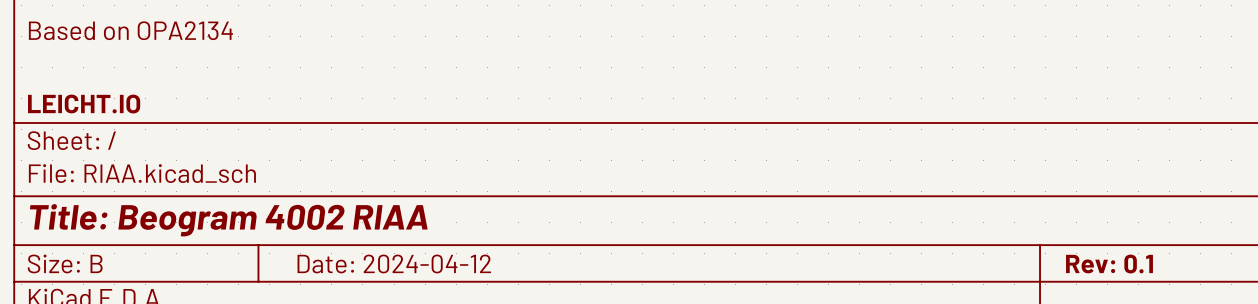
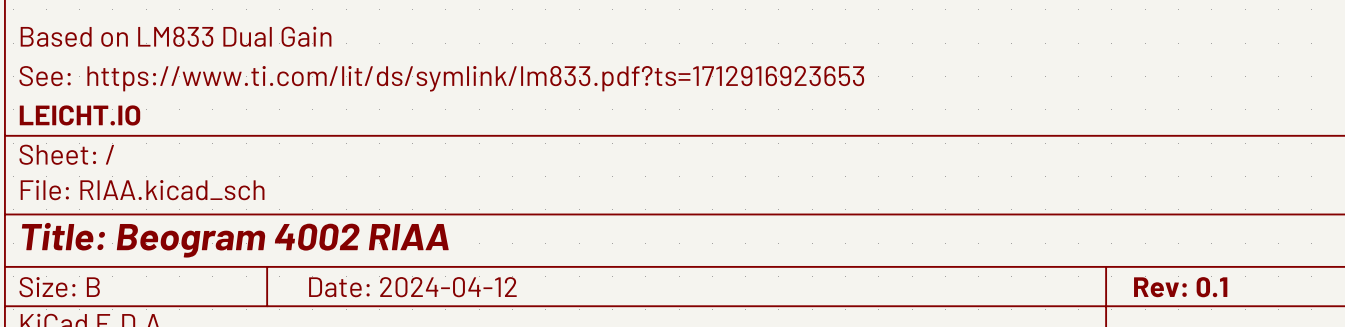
title block: Based on OPA2134 (130, 30) -> Based on LM833 Dual Gain (176, 36)
title block: none -> See: https://www.ti.com/lit/ds/symlink/lm833.pdf?ts=1712916923653 (441, 78)

